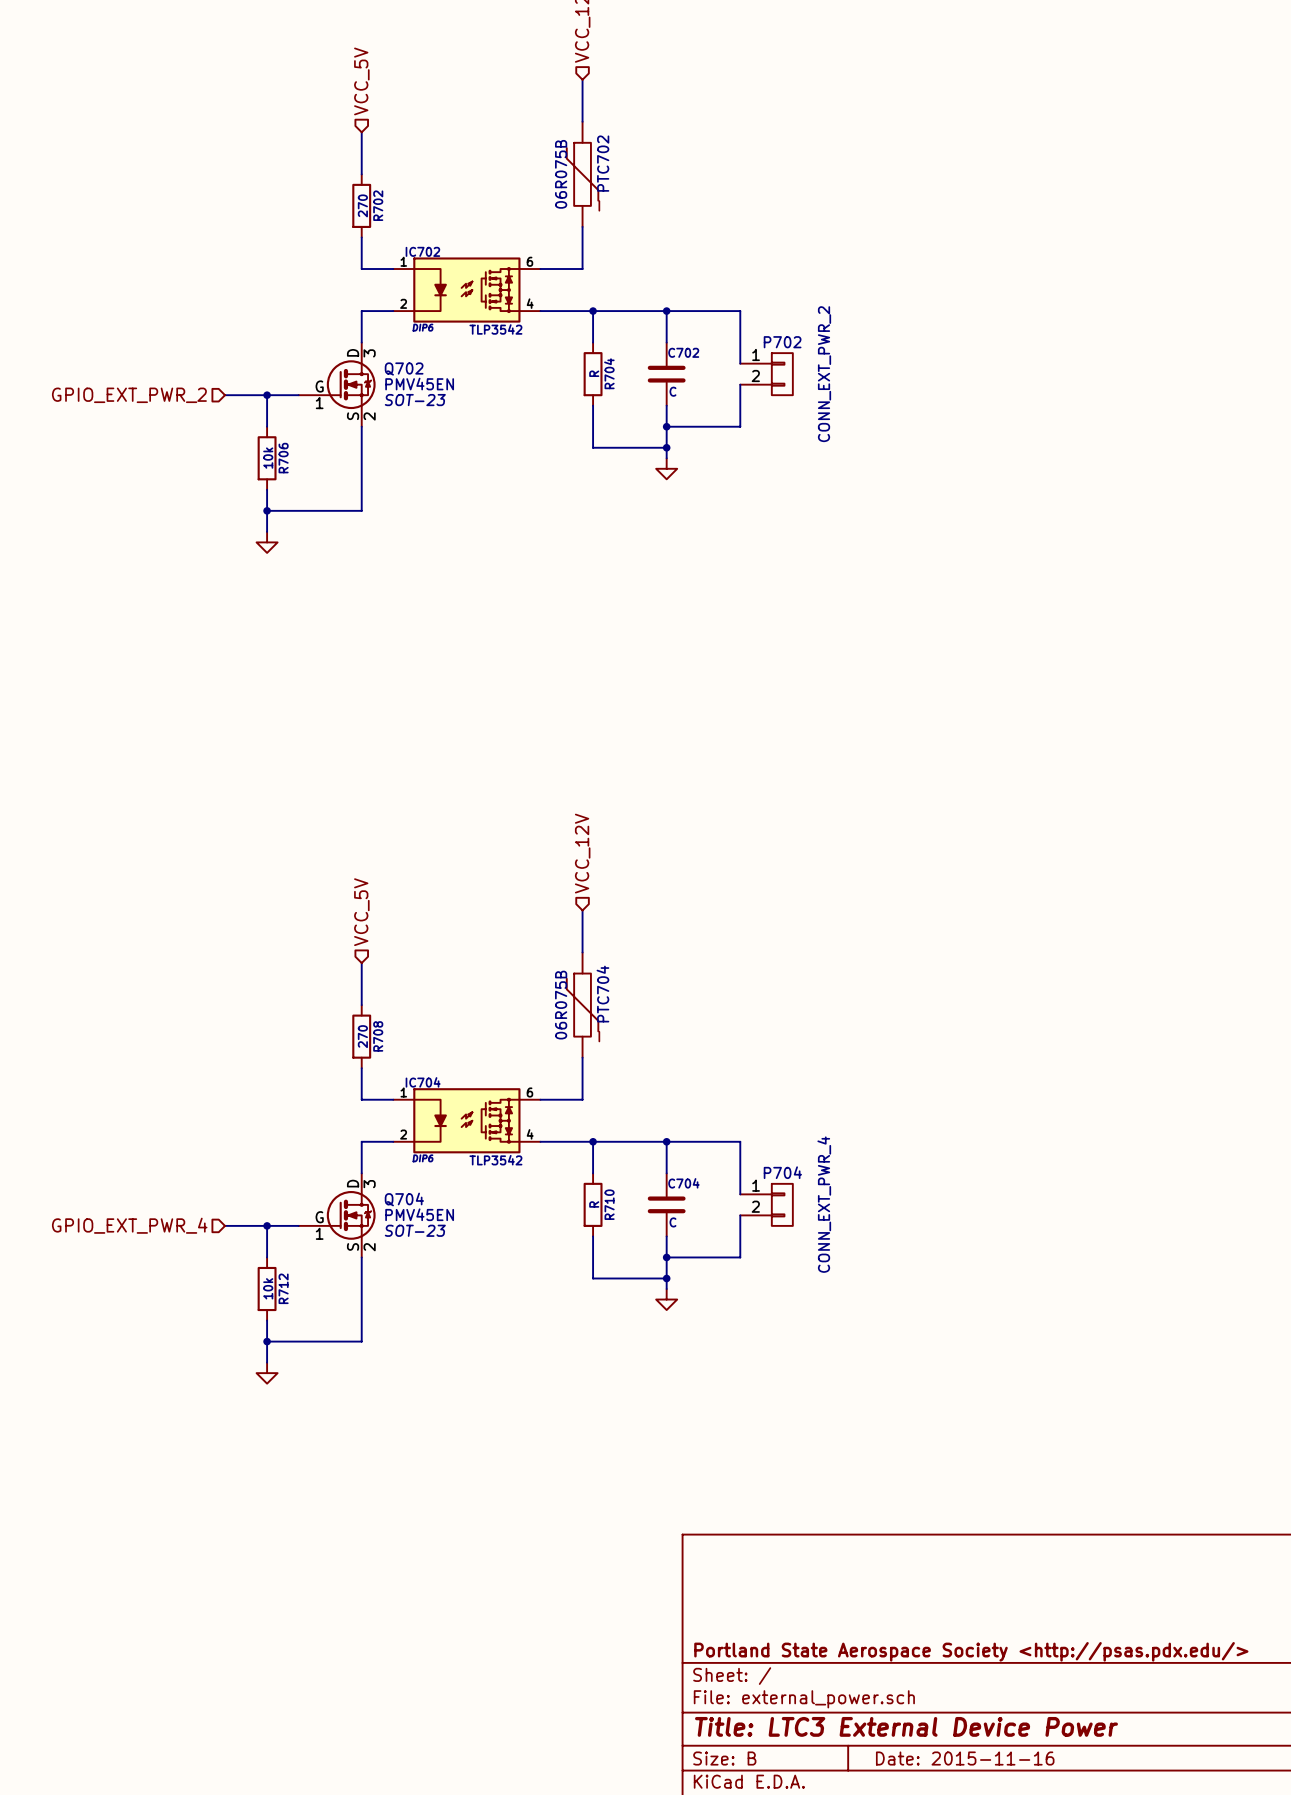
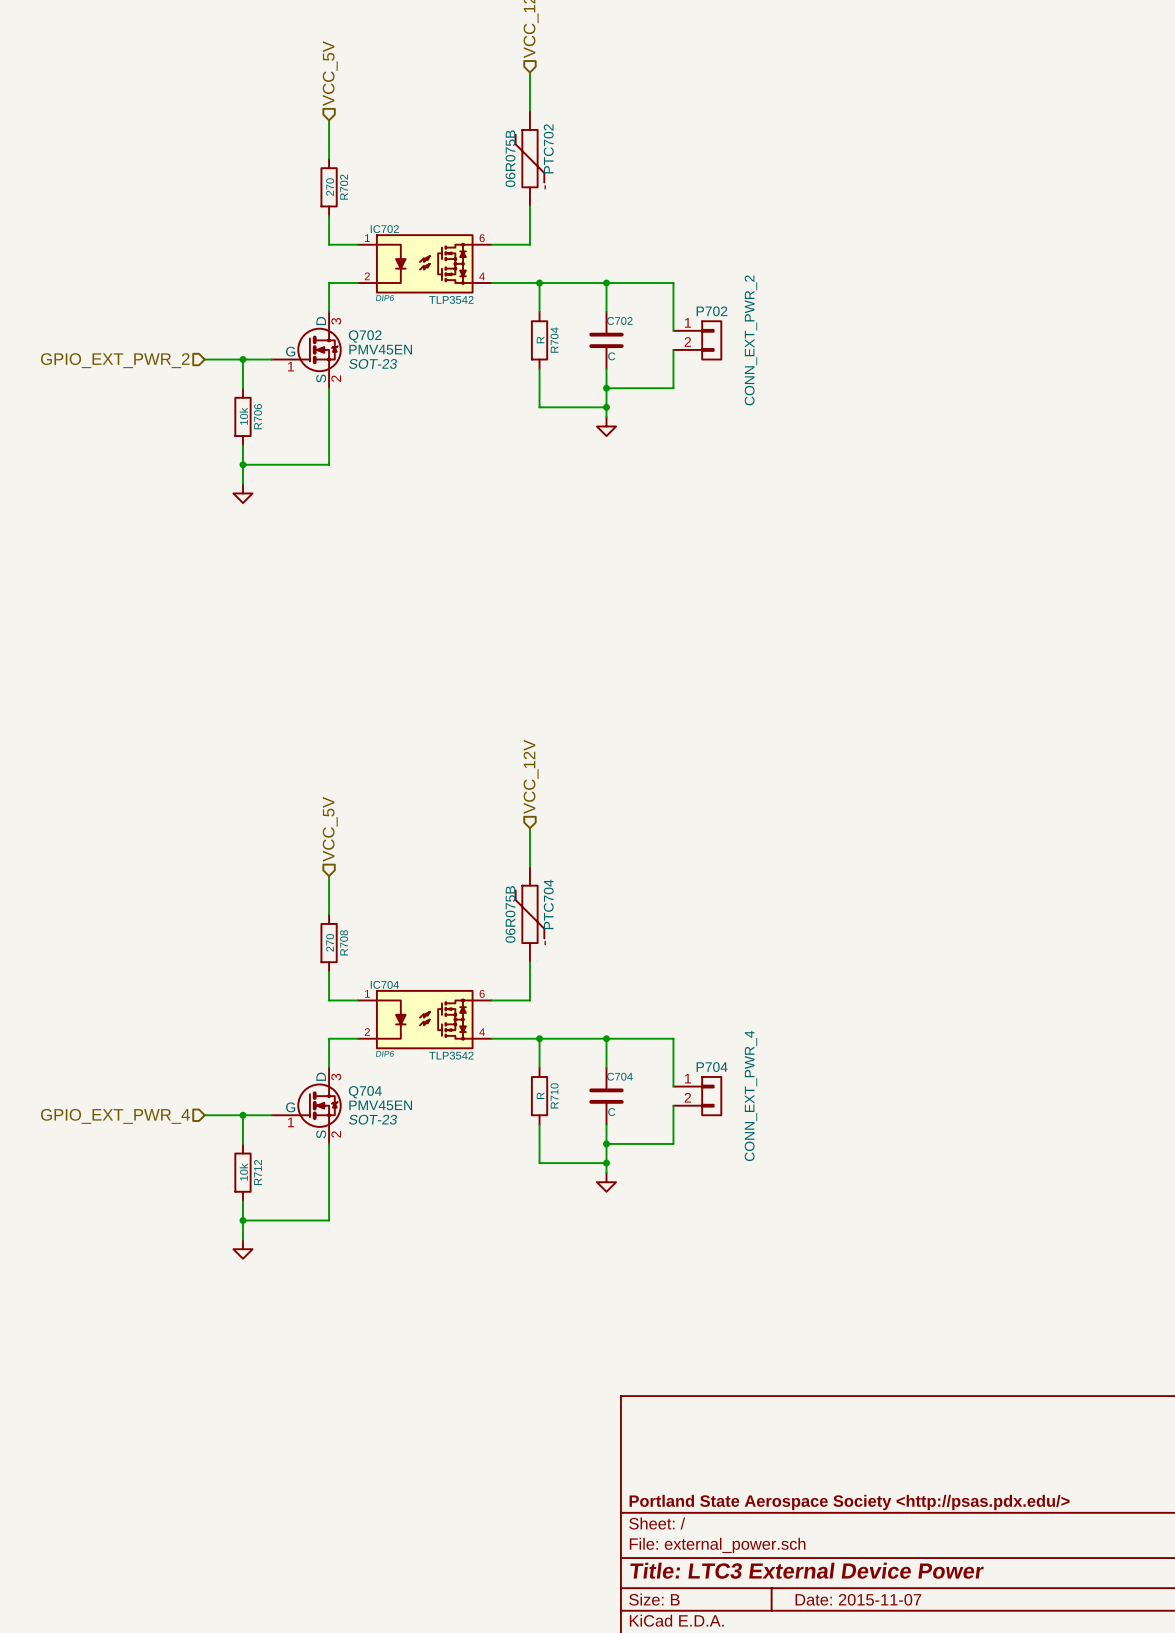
title block: Date: 2015-11-16 (965, 1758) -> Date: 2015-11-07 (858, 1599)

